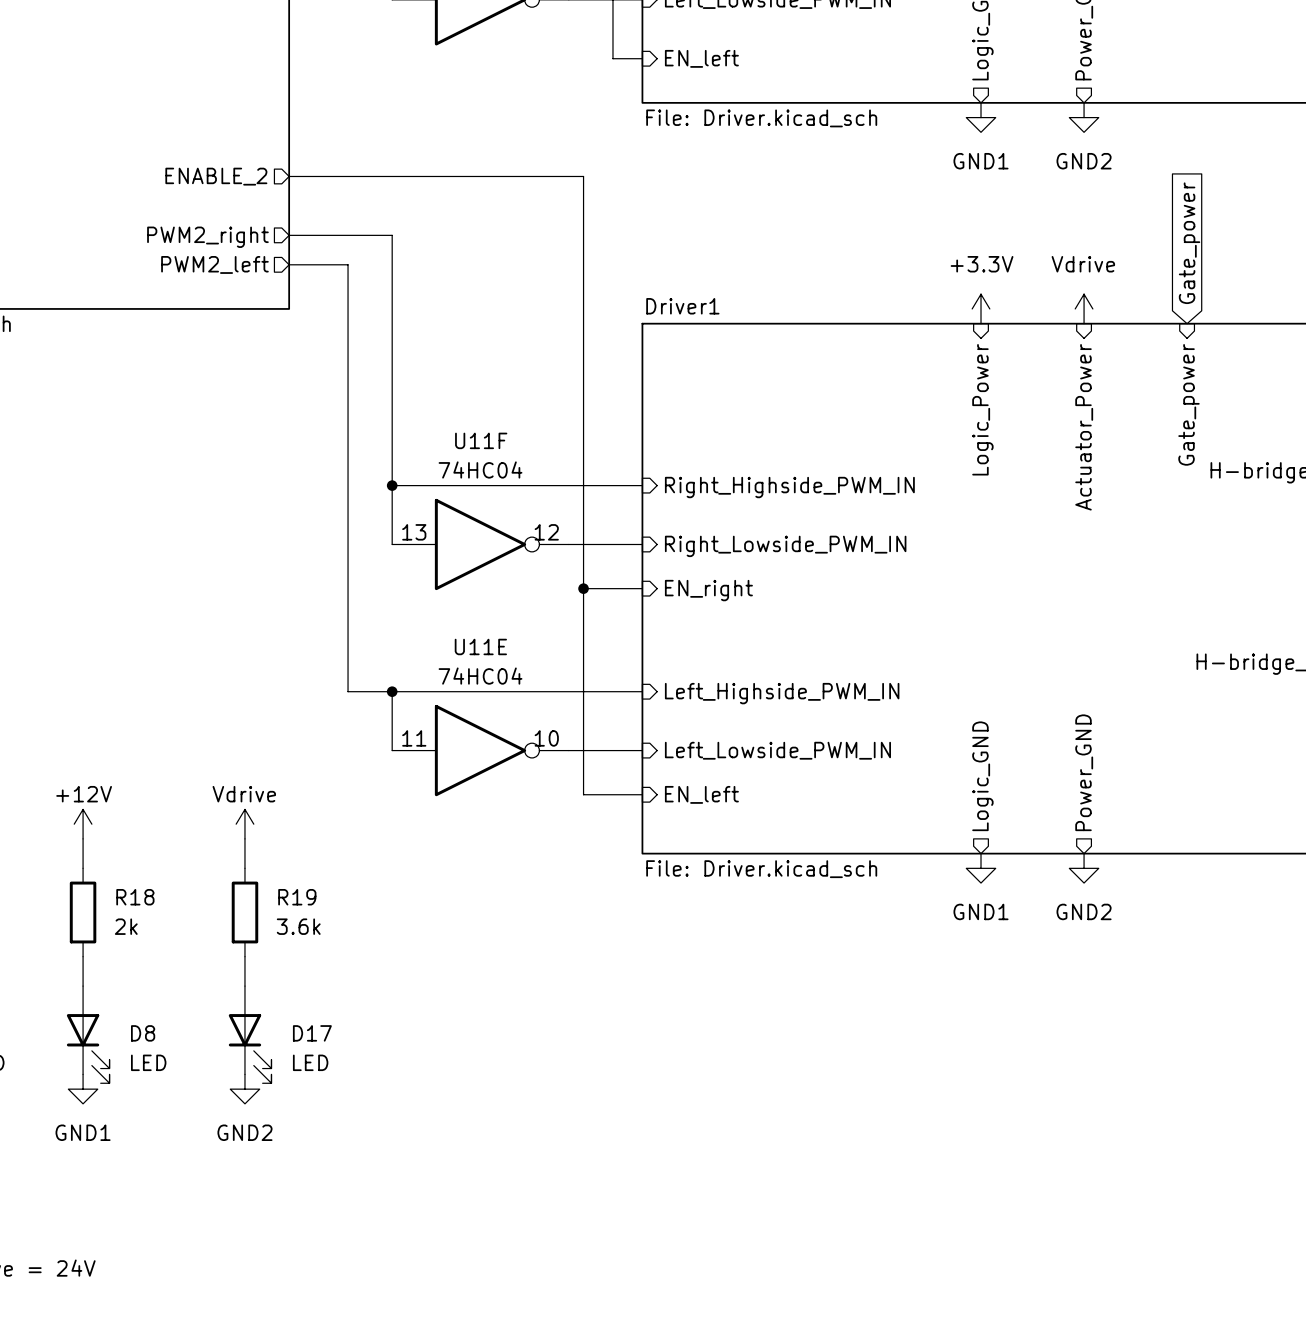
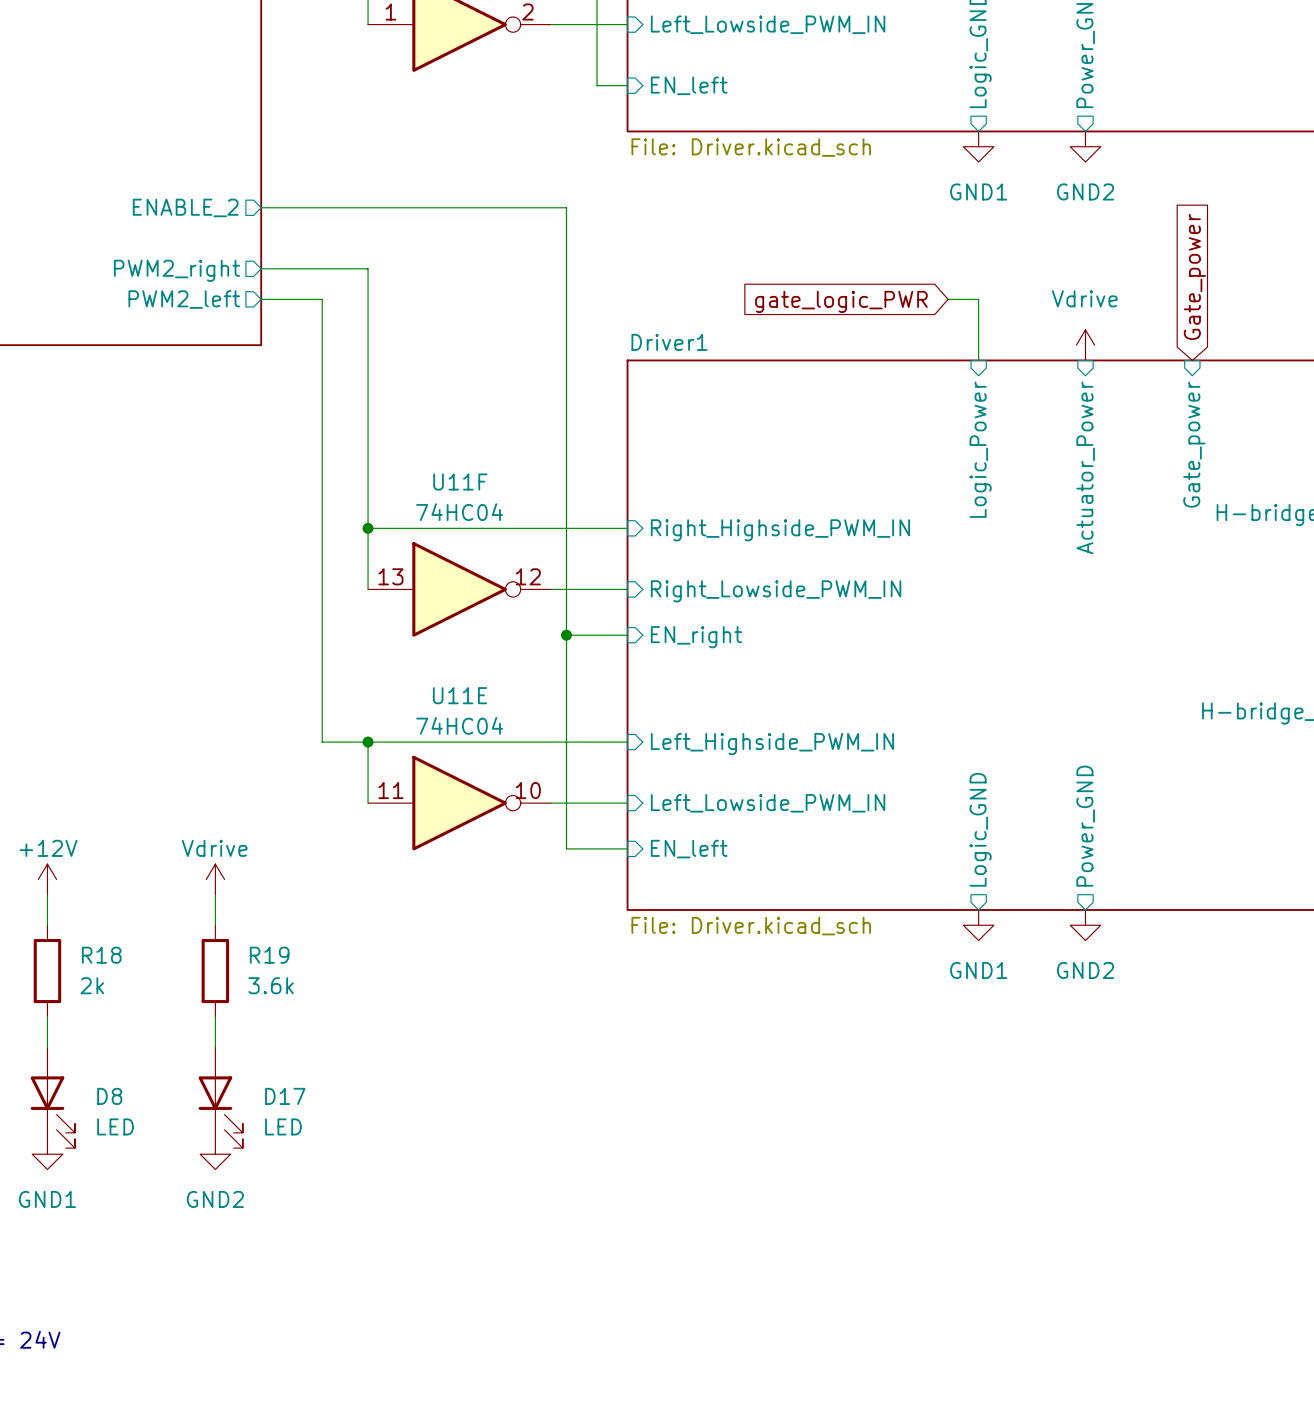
wire: none -> (948, 299) (978, 299) (978, 360)
global label: none -> gate_logic_PWR (841, 301)
power symbol: +3.3V (981, 308) -> none

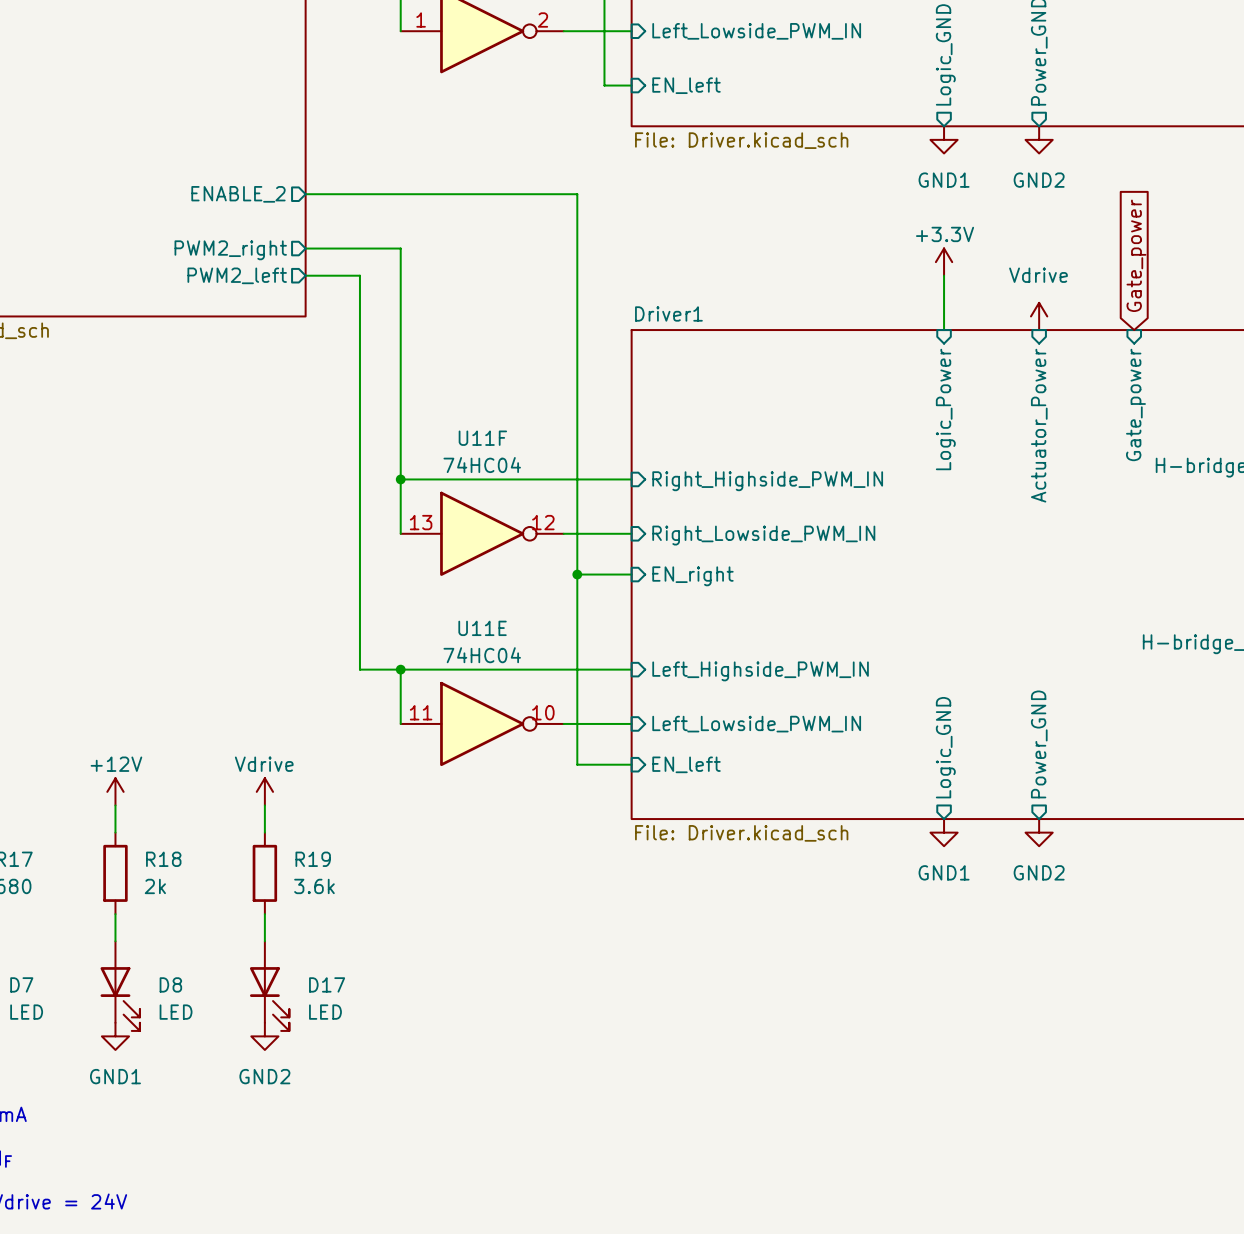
power symbol: none -> +3.3V (944, 262)
wire: (948, 299) (978, 299) -> none
global label: gate_logic_PWR (841, 301) -> none

